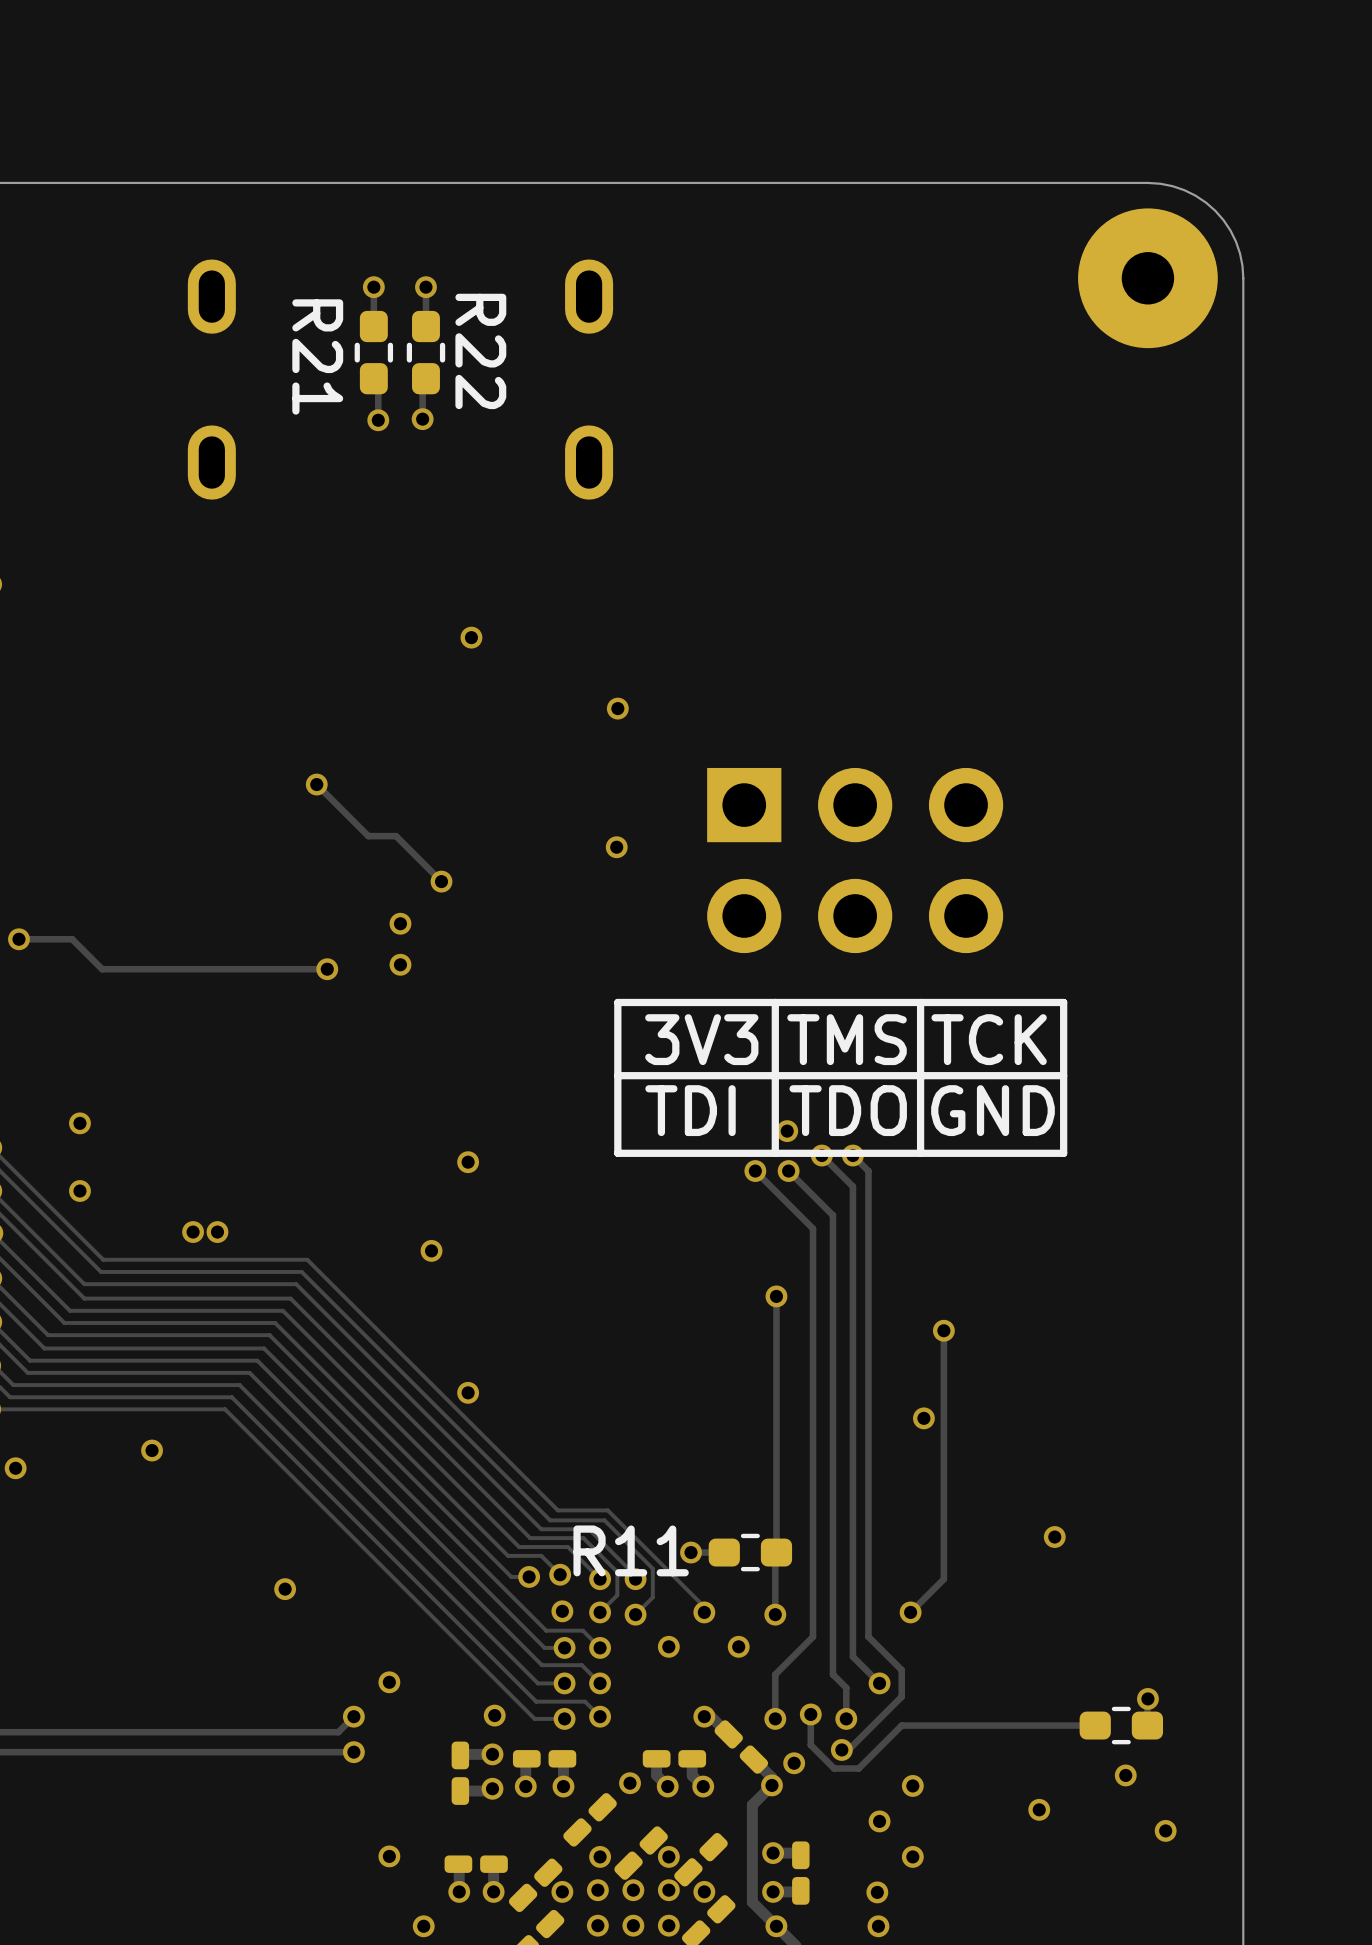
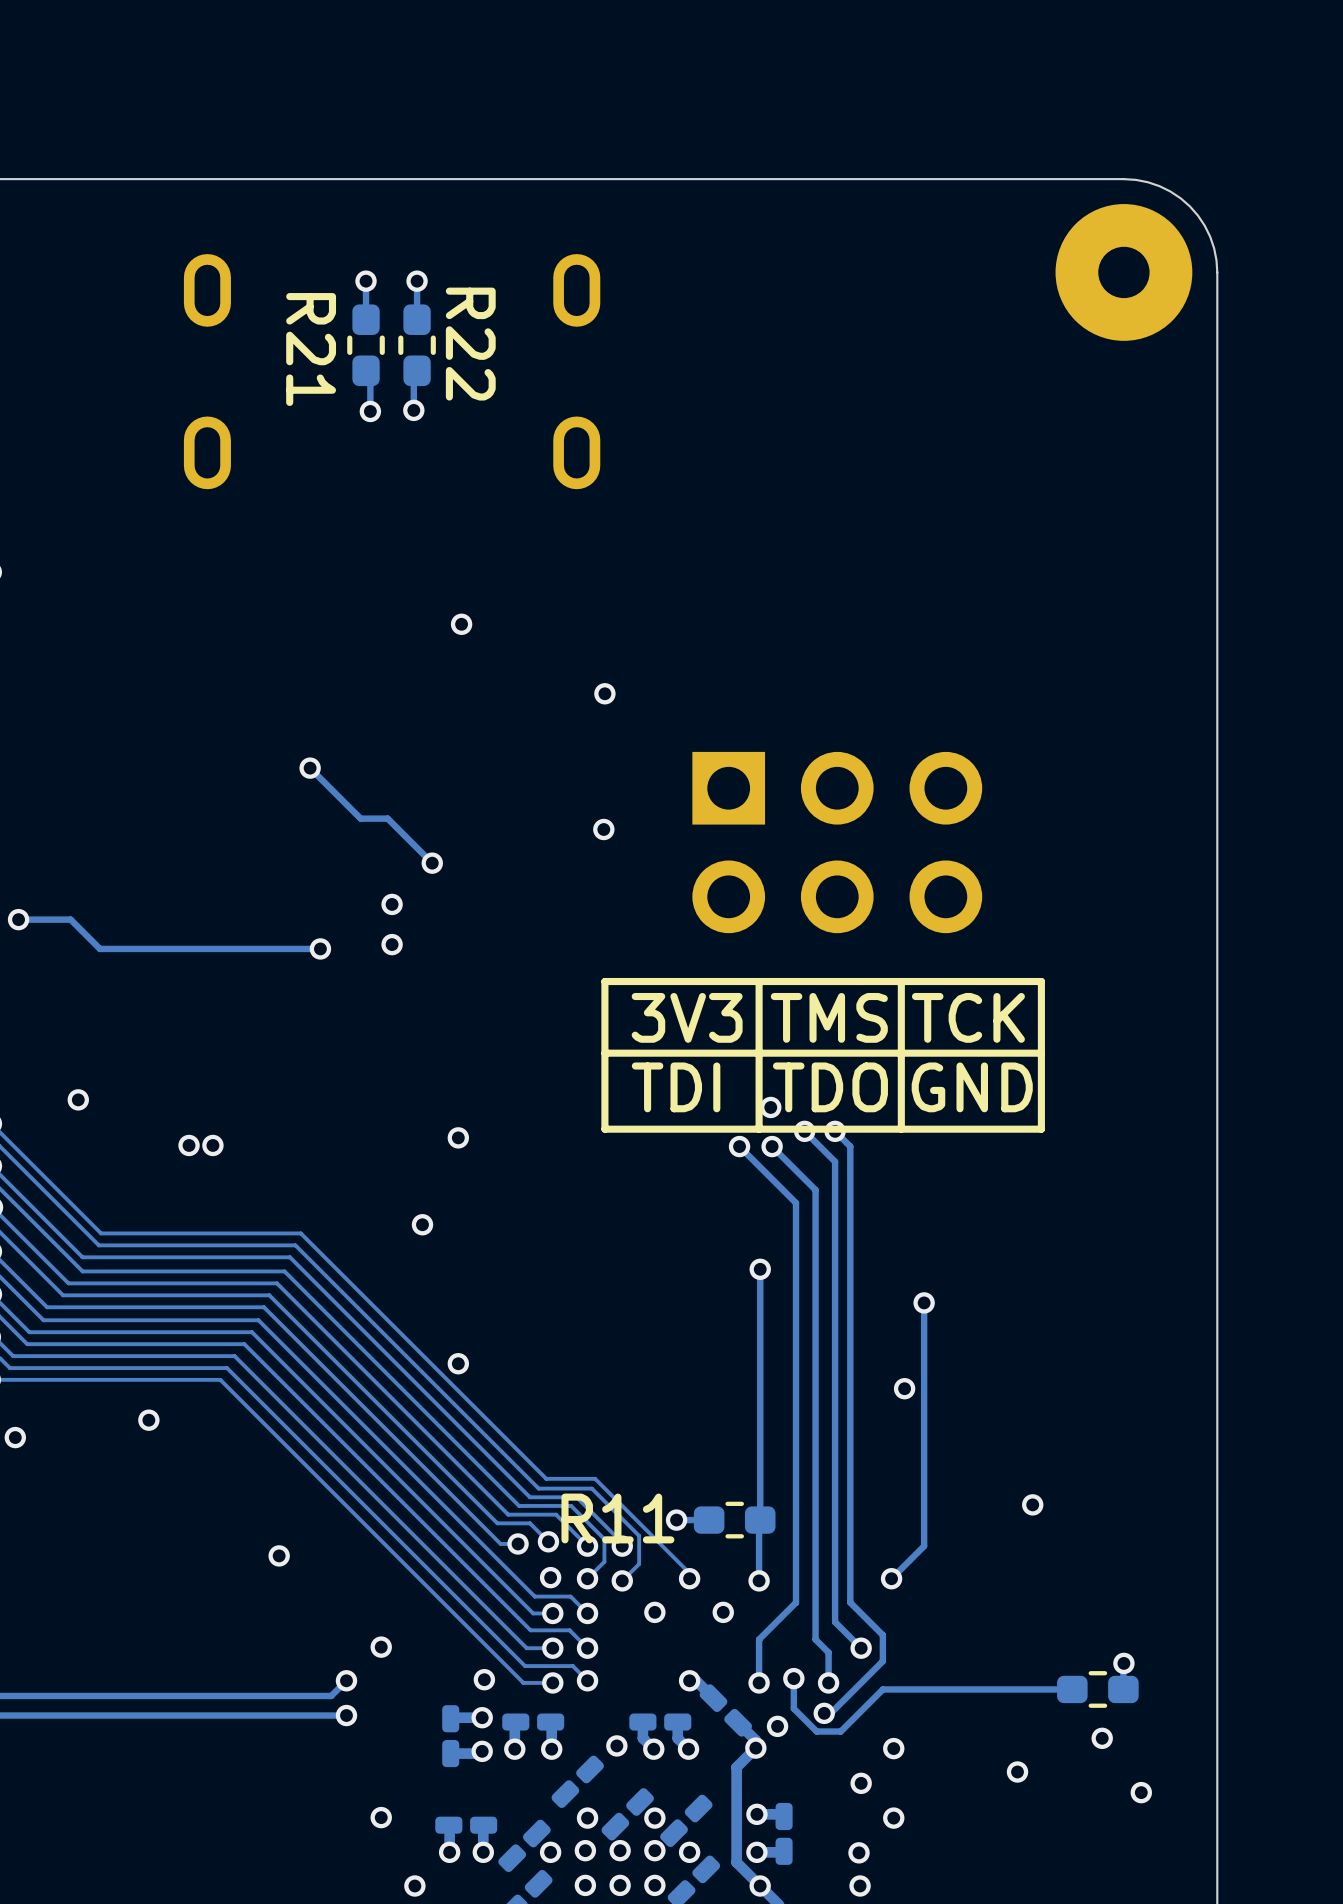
via: none -> (189, 1145)
via: none -> (212, 1145)
via: (79, 1191) -> none
via: (193, 1232) -> none
via: (217, 1232) -> none

